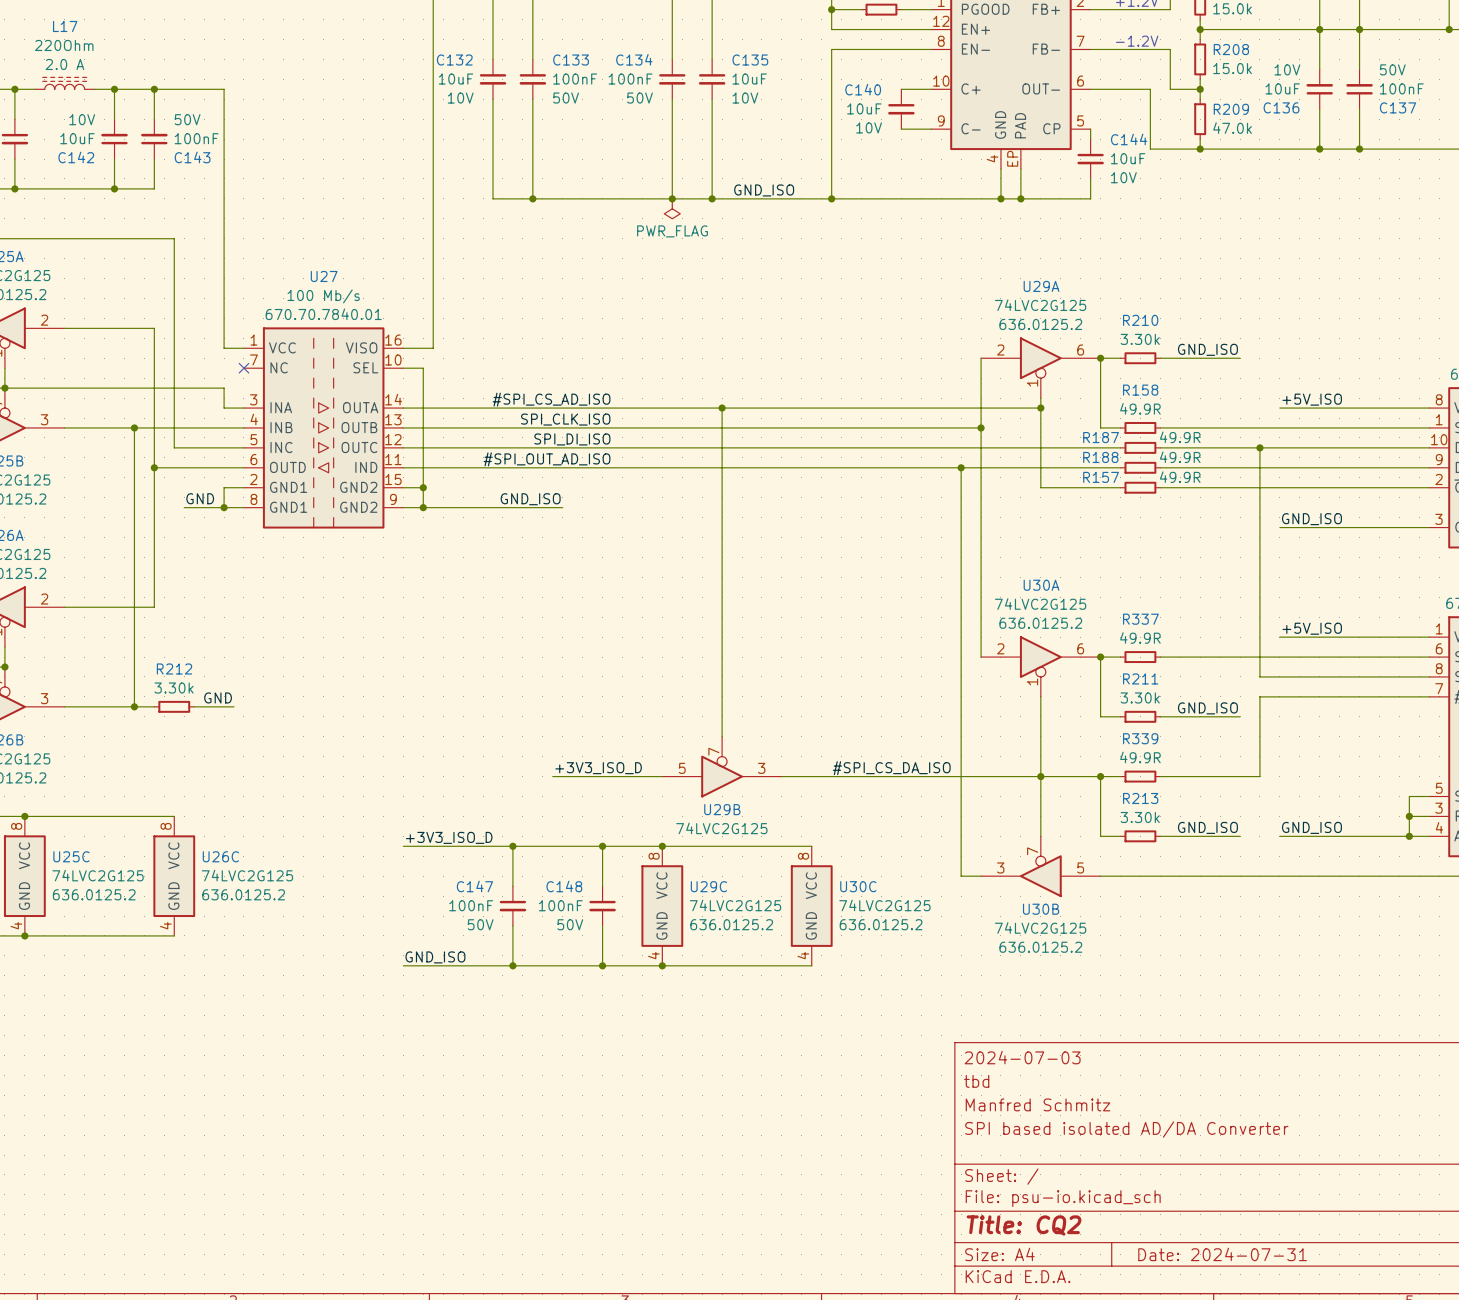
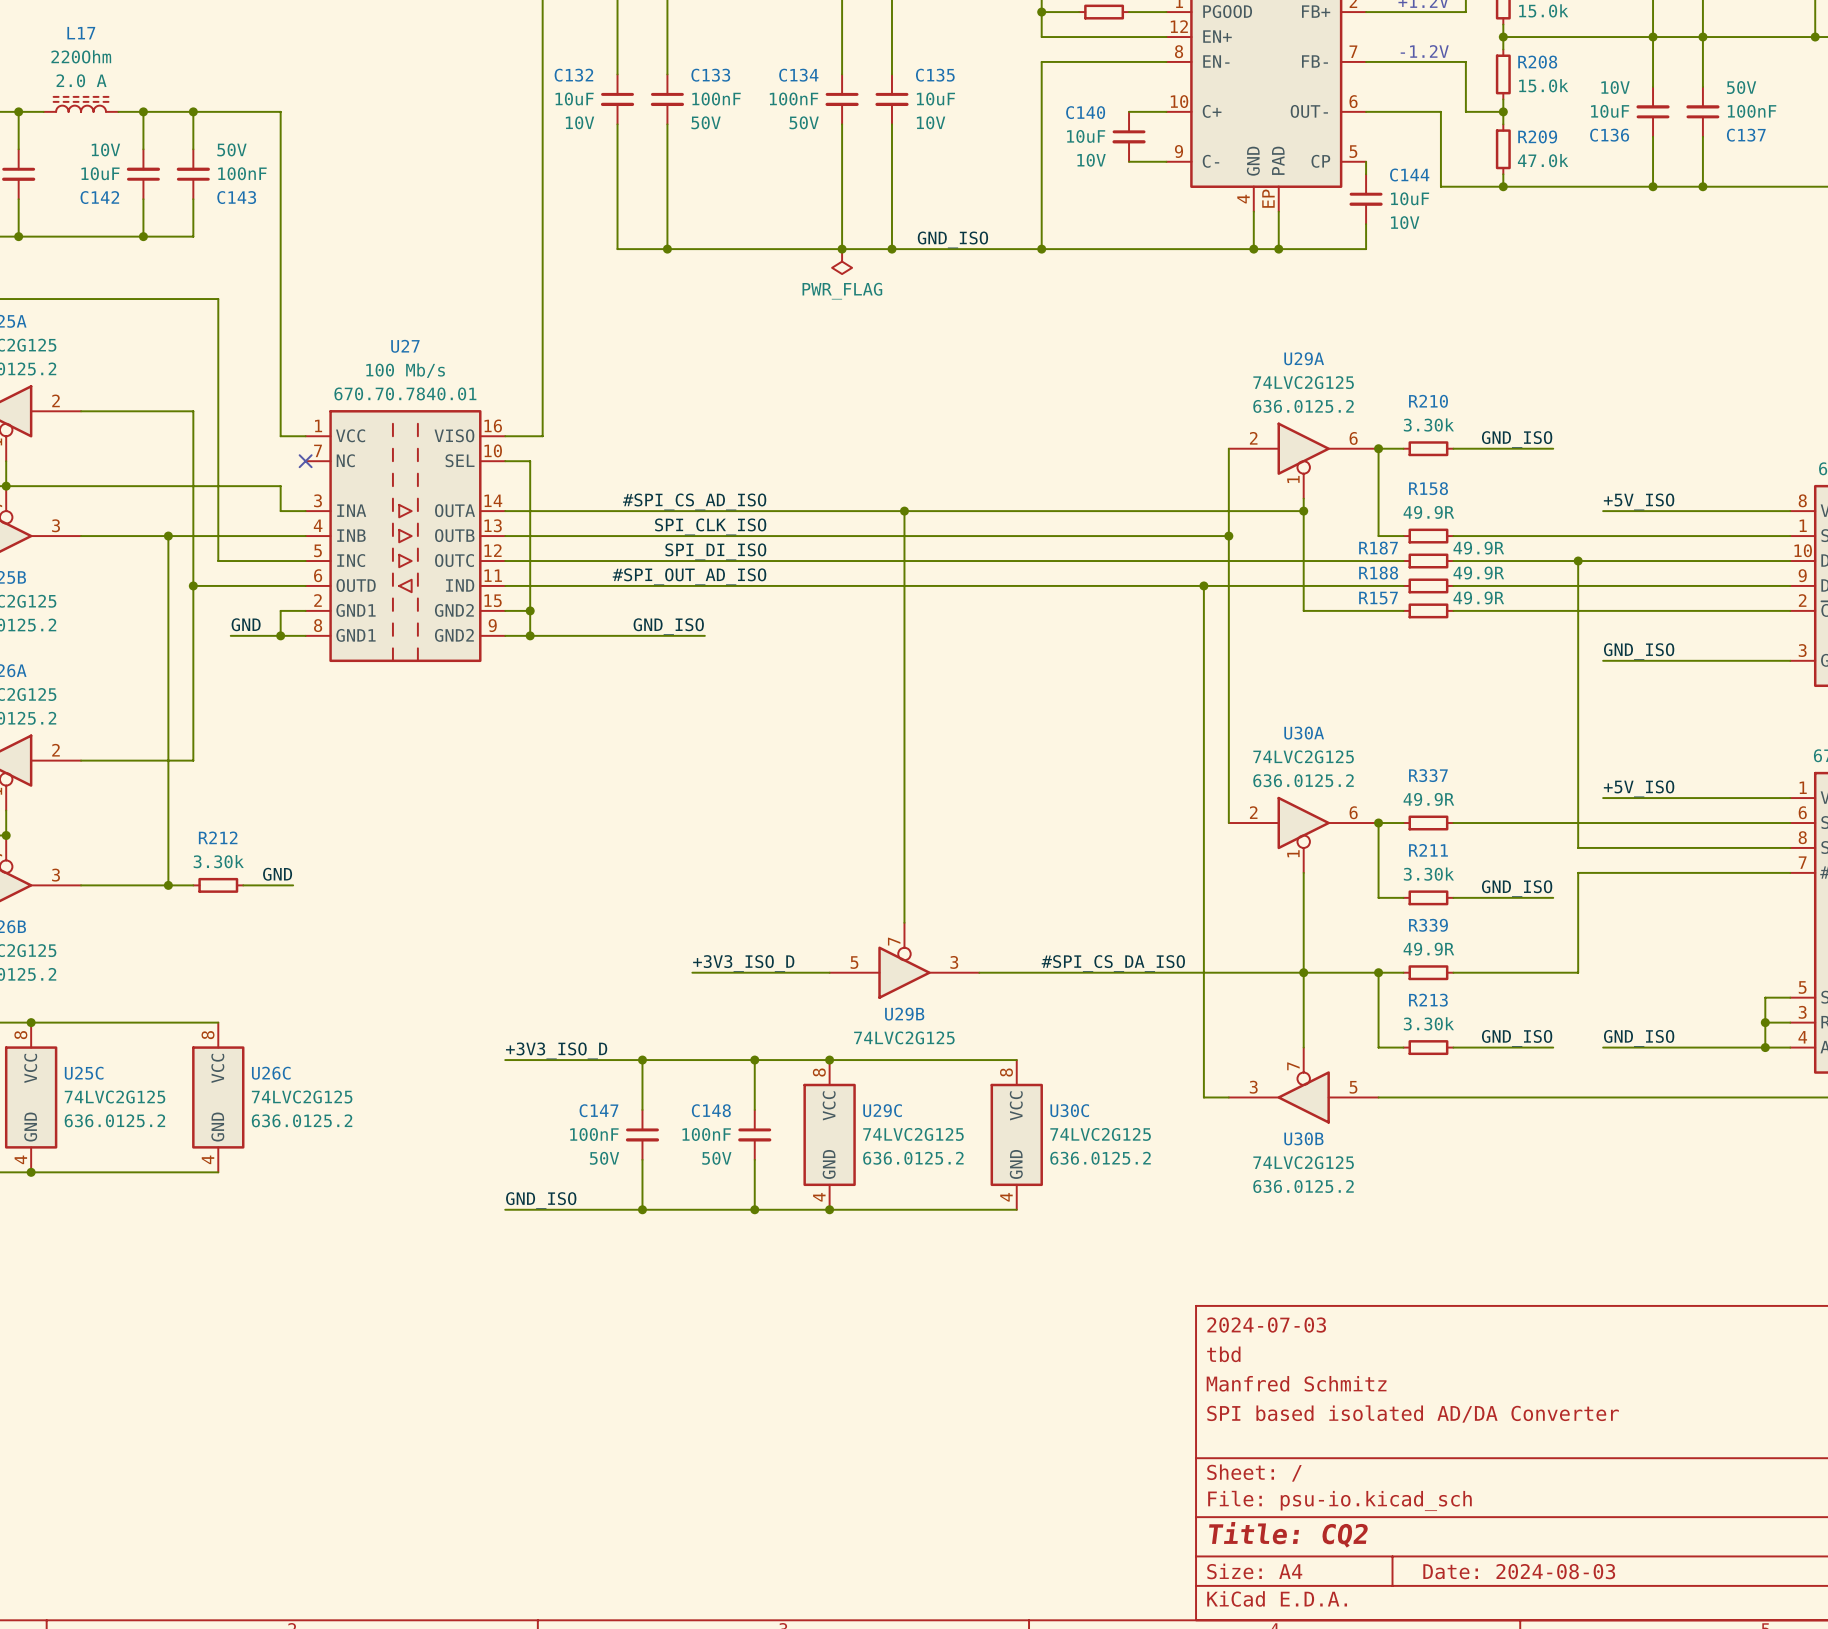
title block: Date: 2024-07-31 (1222, 1254) -> Date: 2024-08-03 (1519, 1571)

